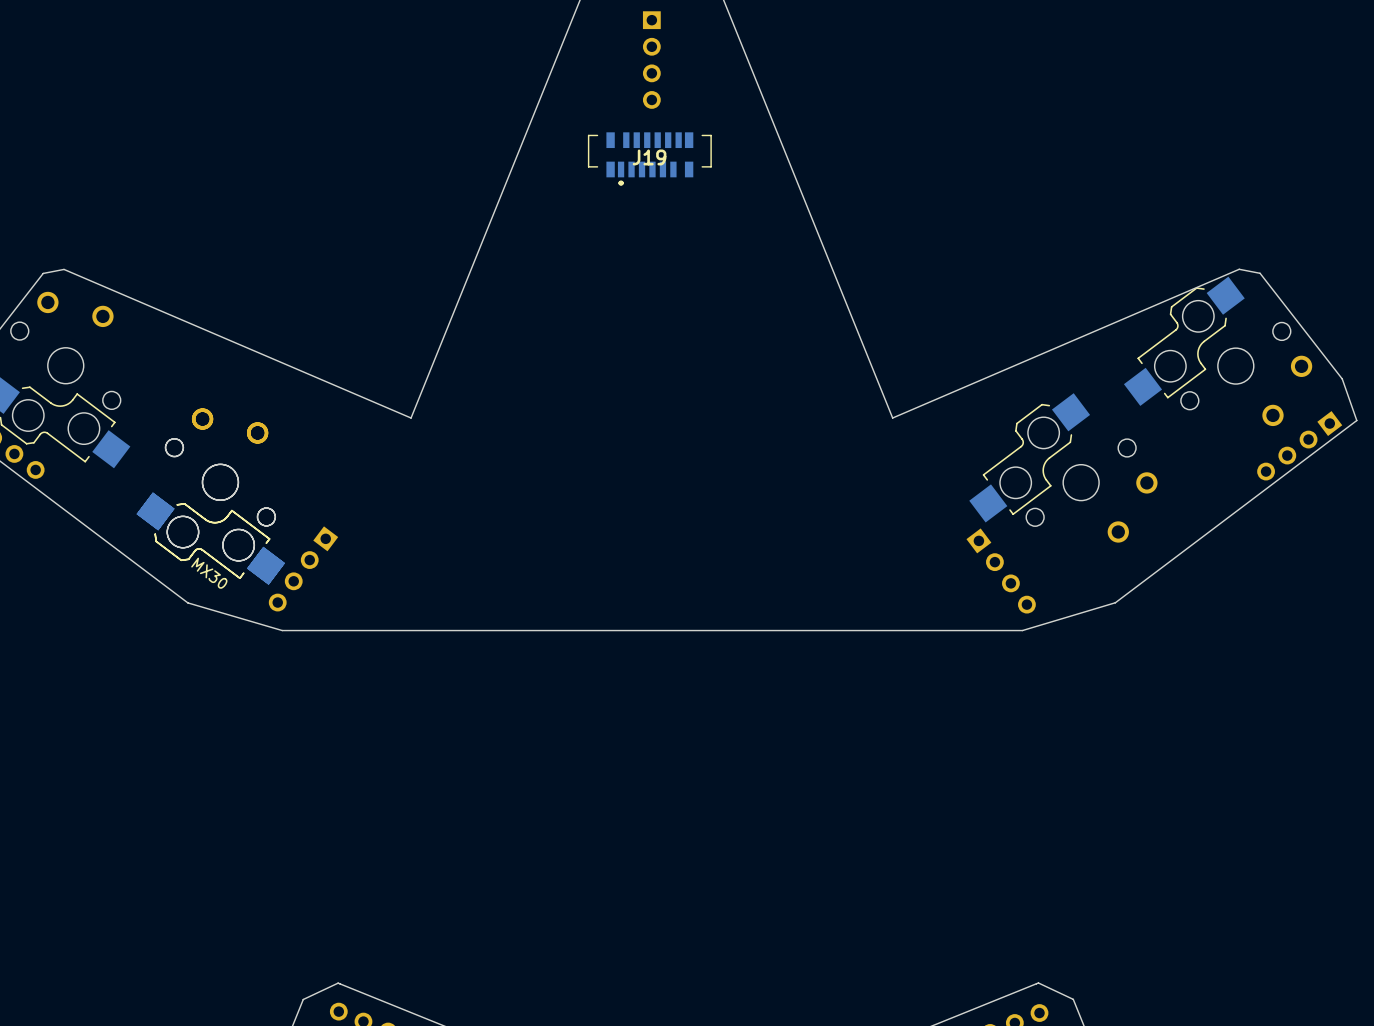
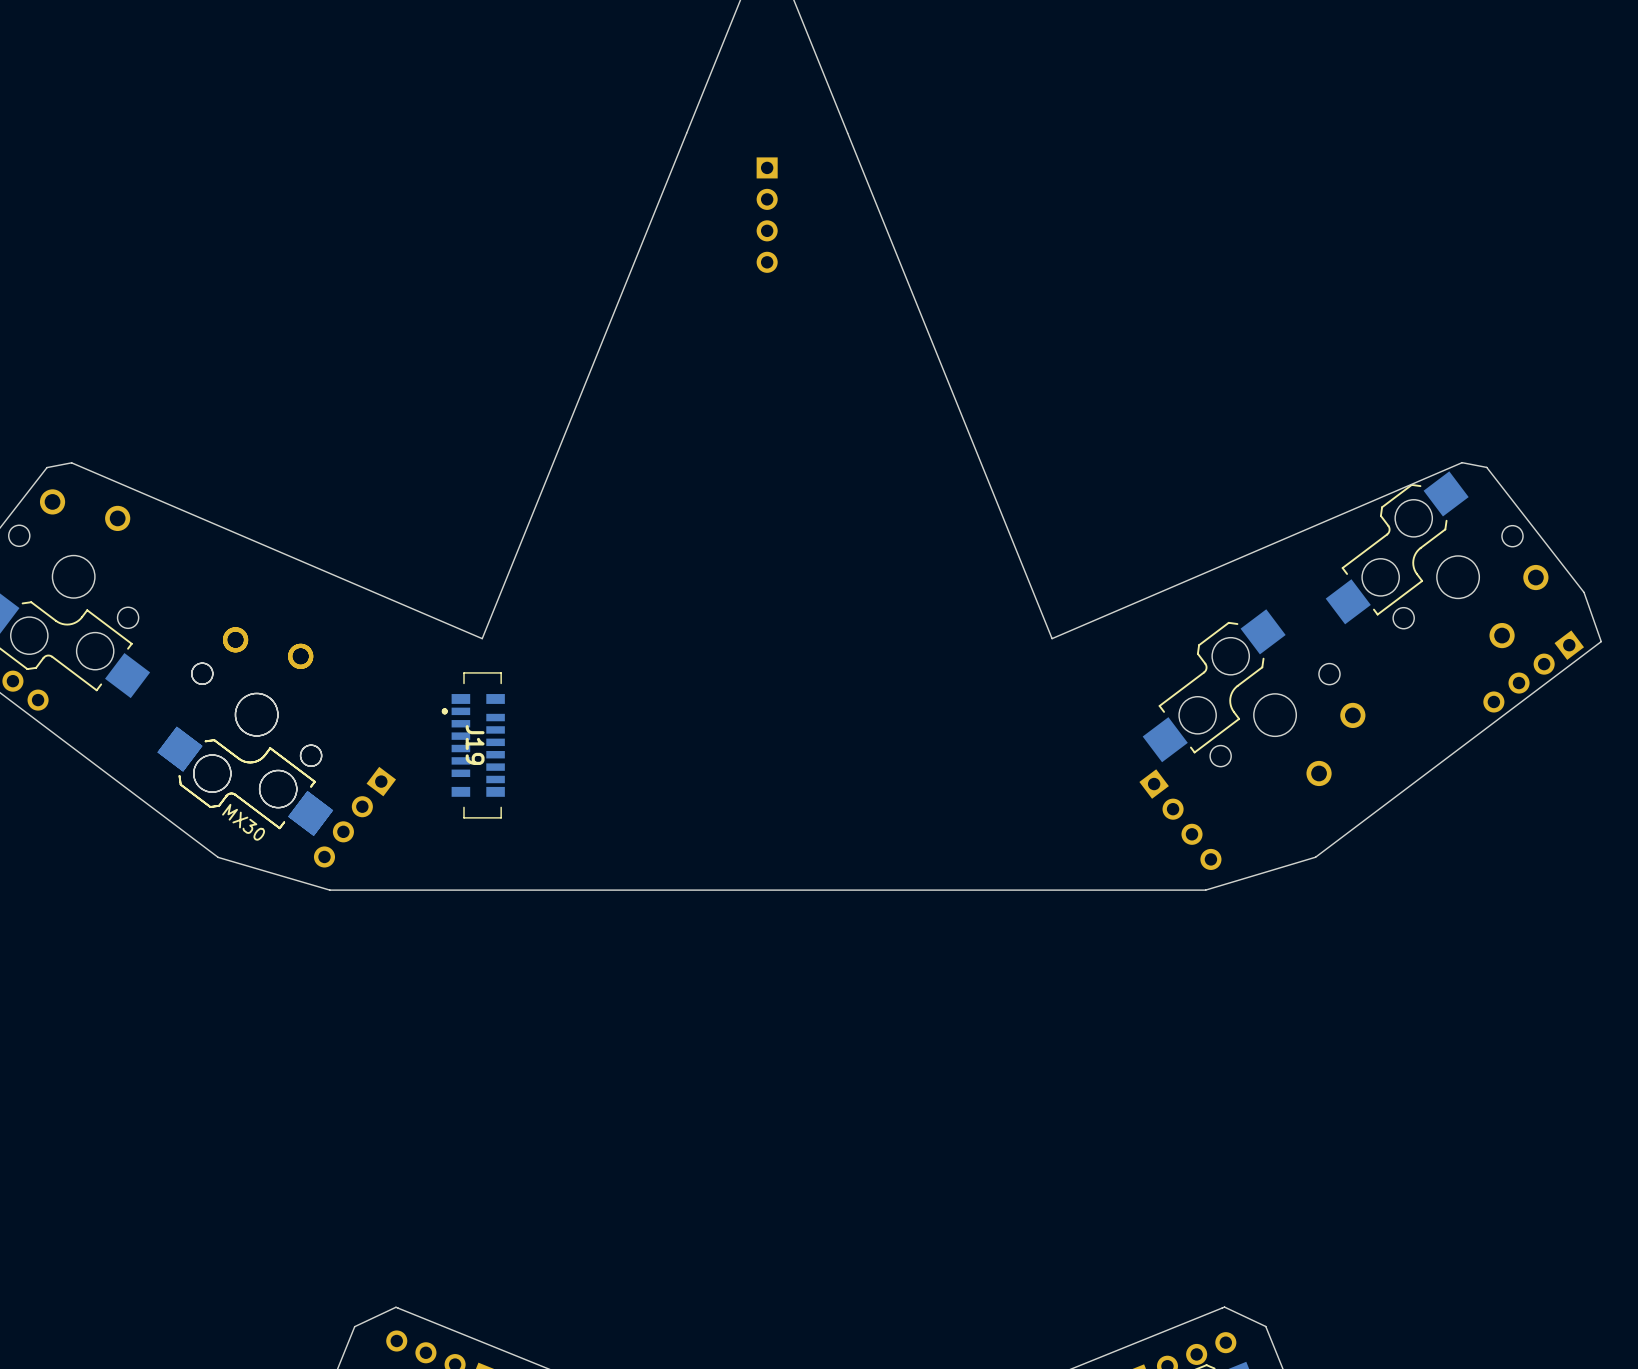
J19 rotation: 0° (649, 159) -> 90° clockwise (473, 745)
J19 position: (649, 159) -> (473, 745)

